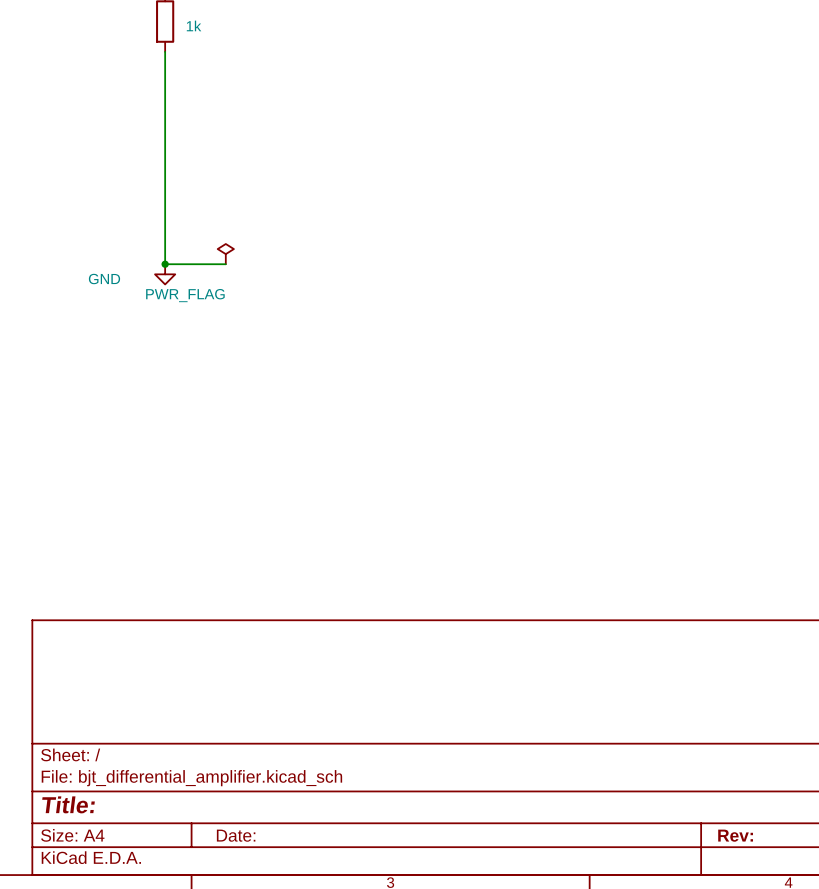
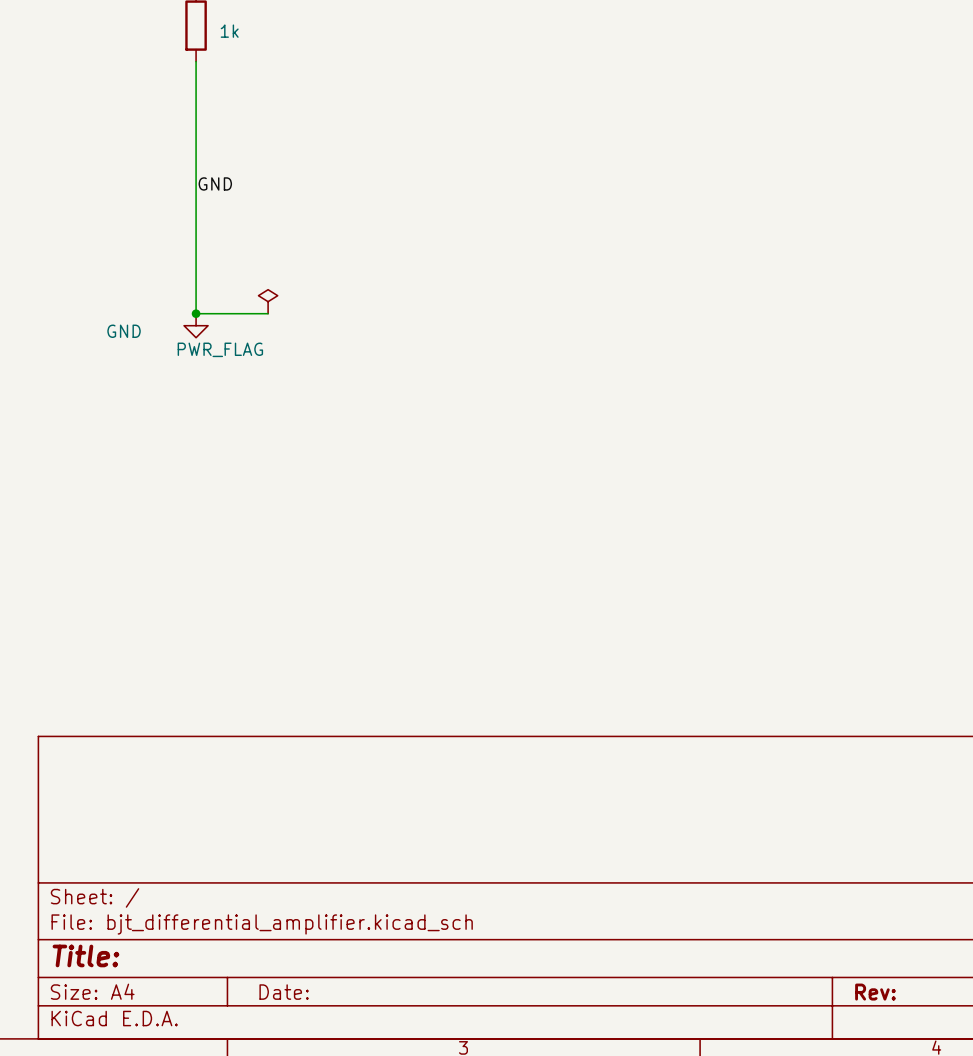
label: none -> GND (215, 183)

